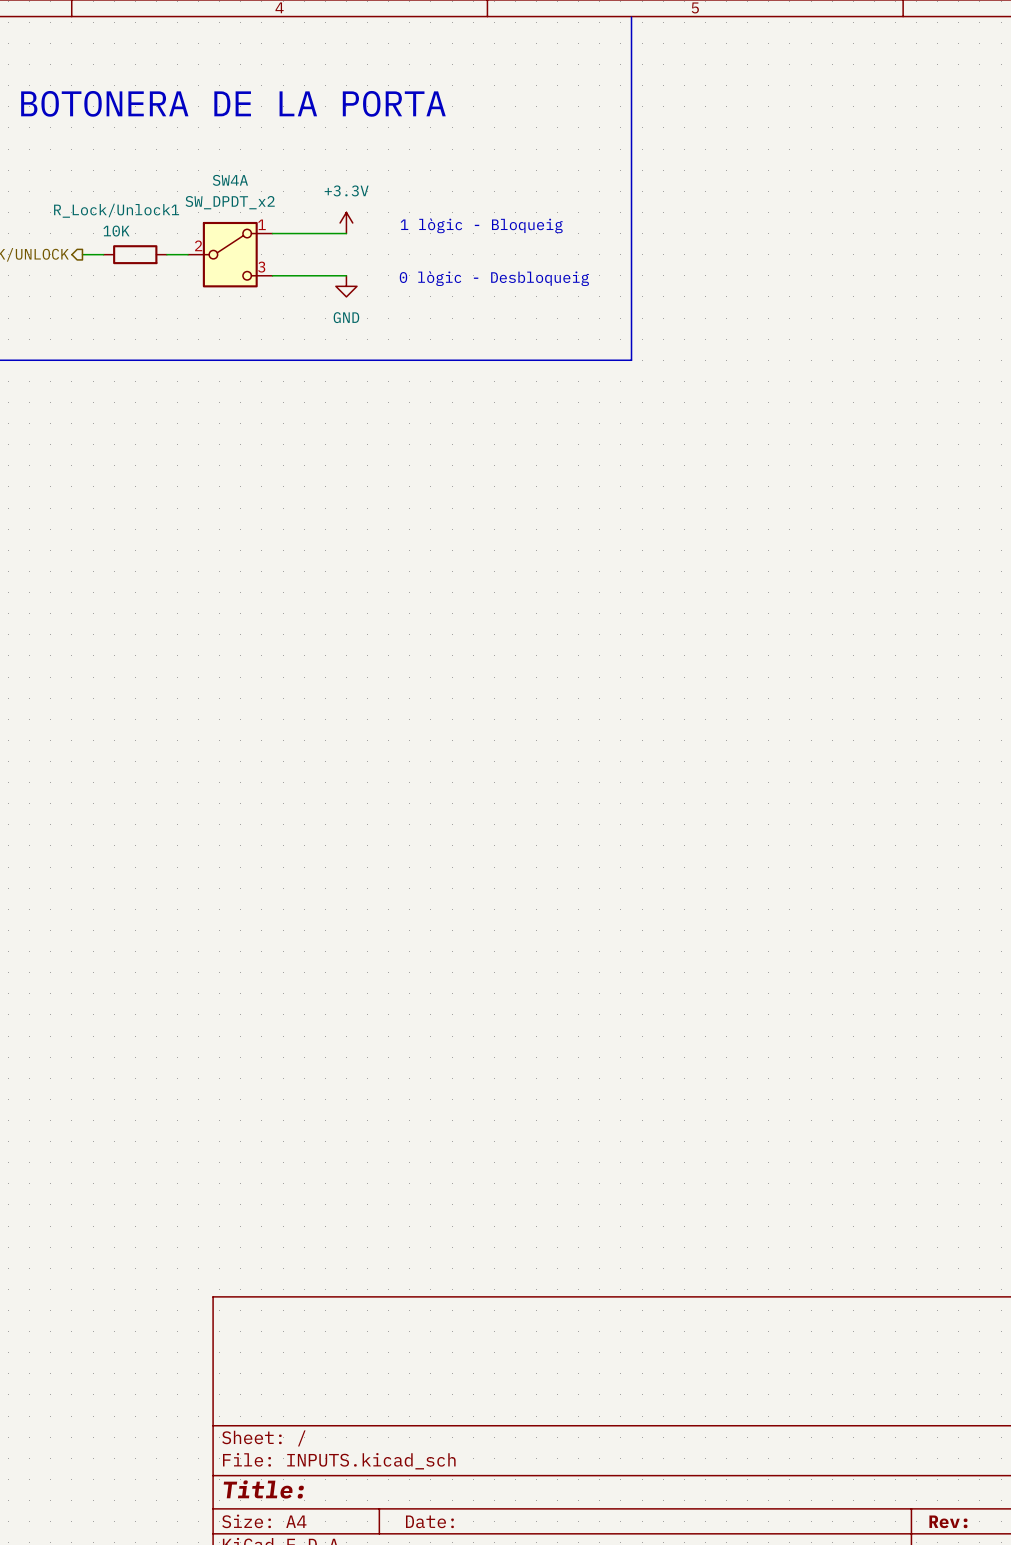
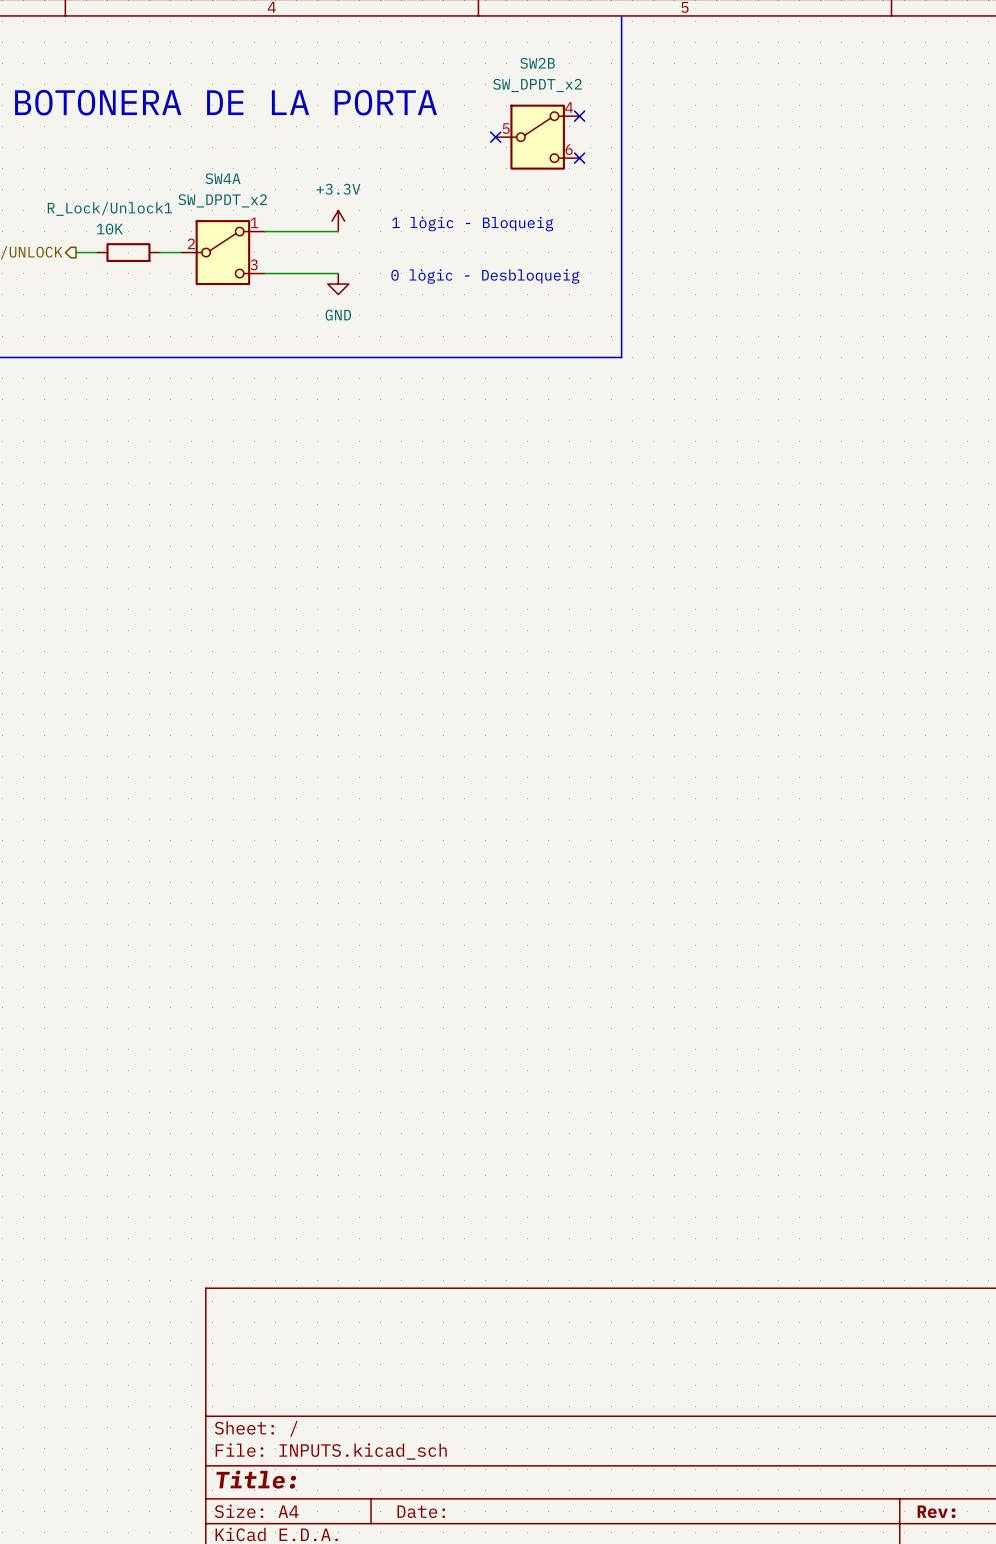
no-connect mark: none -> (579, 116)
no-connect mark: none -> (495, 137)
SW2B: none -> SW_DPDT_x2 (537, 137)
no-connect mark: none -> (579, 158)

